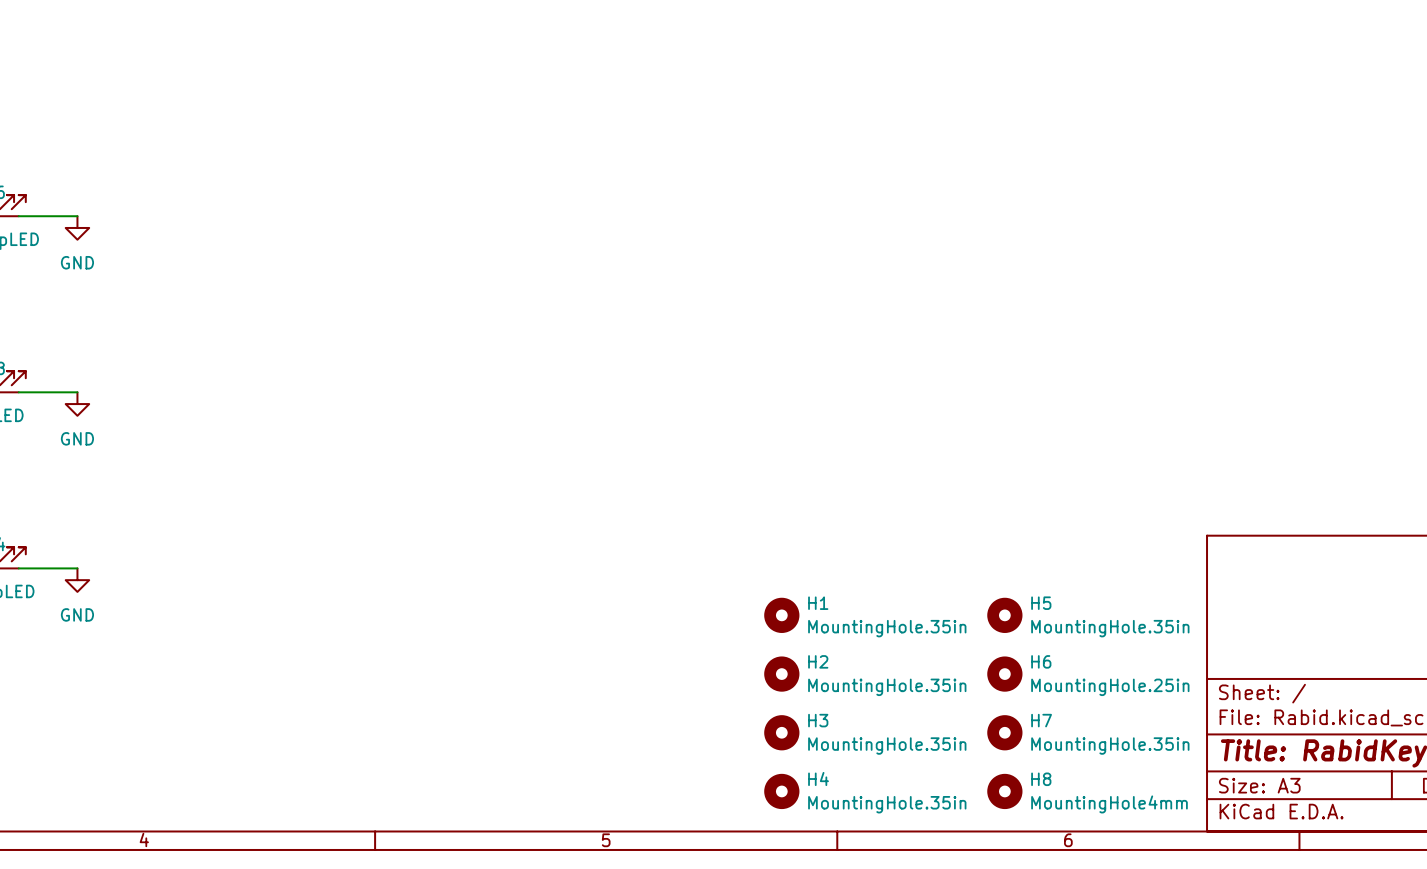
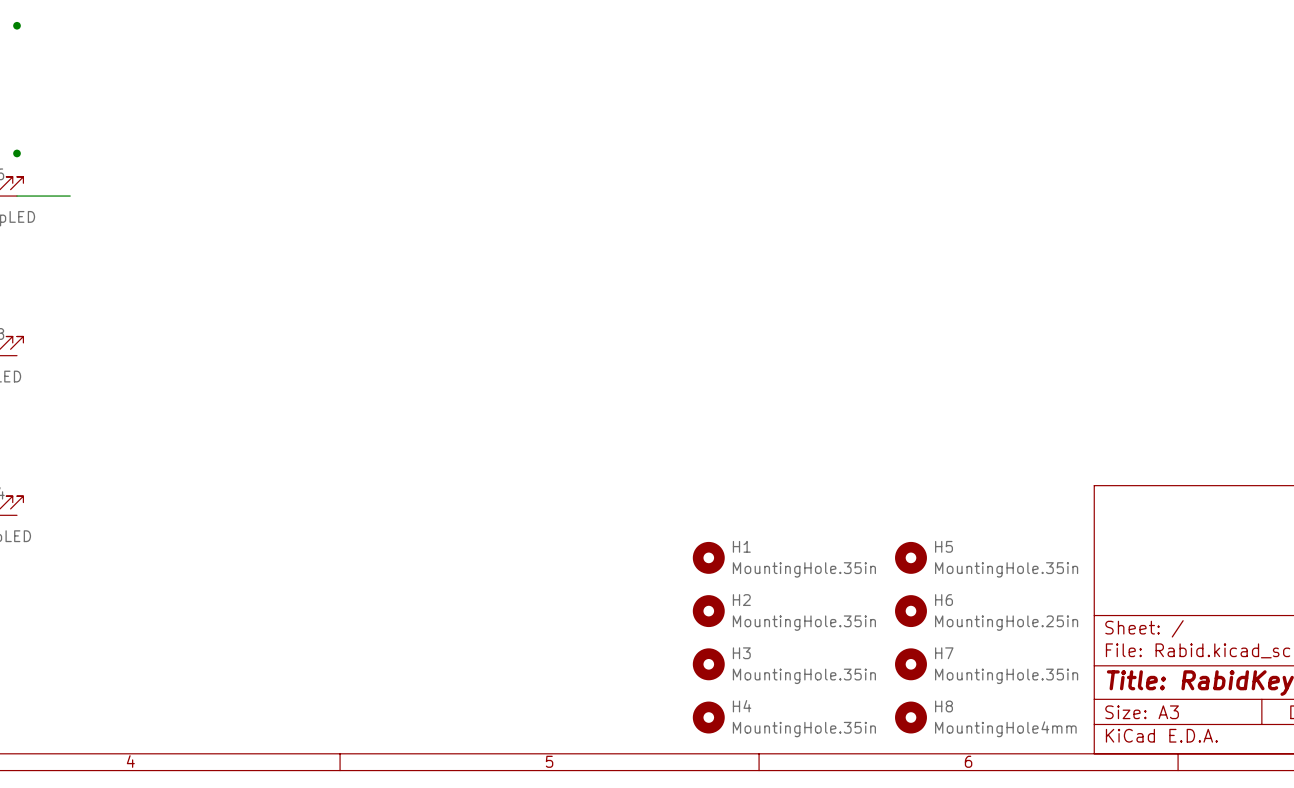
junction: none -> (17, 25)
junction: none -> (17, 153)
power symbol: GND (77, 227) -> none
wire: (18, 392) (77, 392) -> none
power symbol: GND (77, 404) -> none
wire: (18, 568) (77, 568) -> none
power symbol: GND (77, 580) -> none

